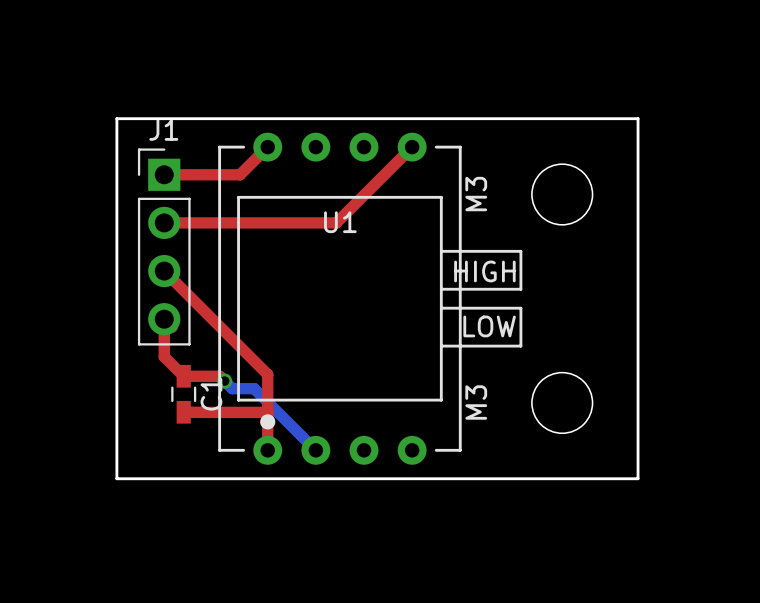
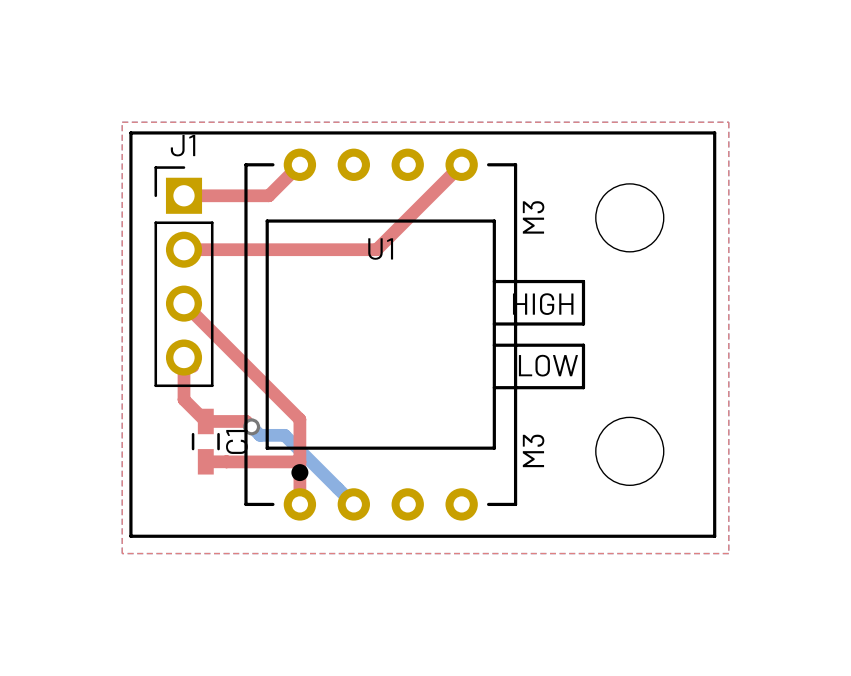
top zone outline: none -> (122, 122) (728, 122) (728, 553) (122, 553) (122, 122)

